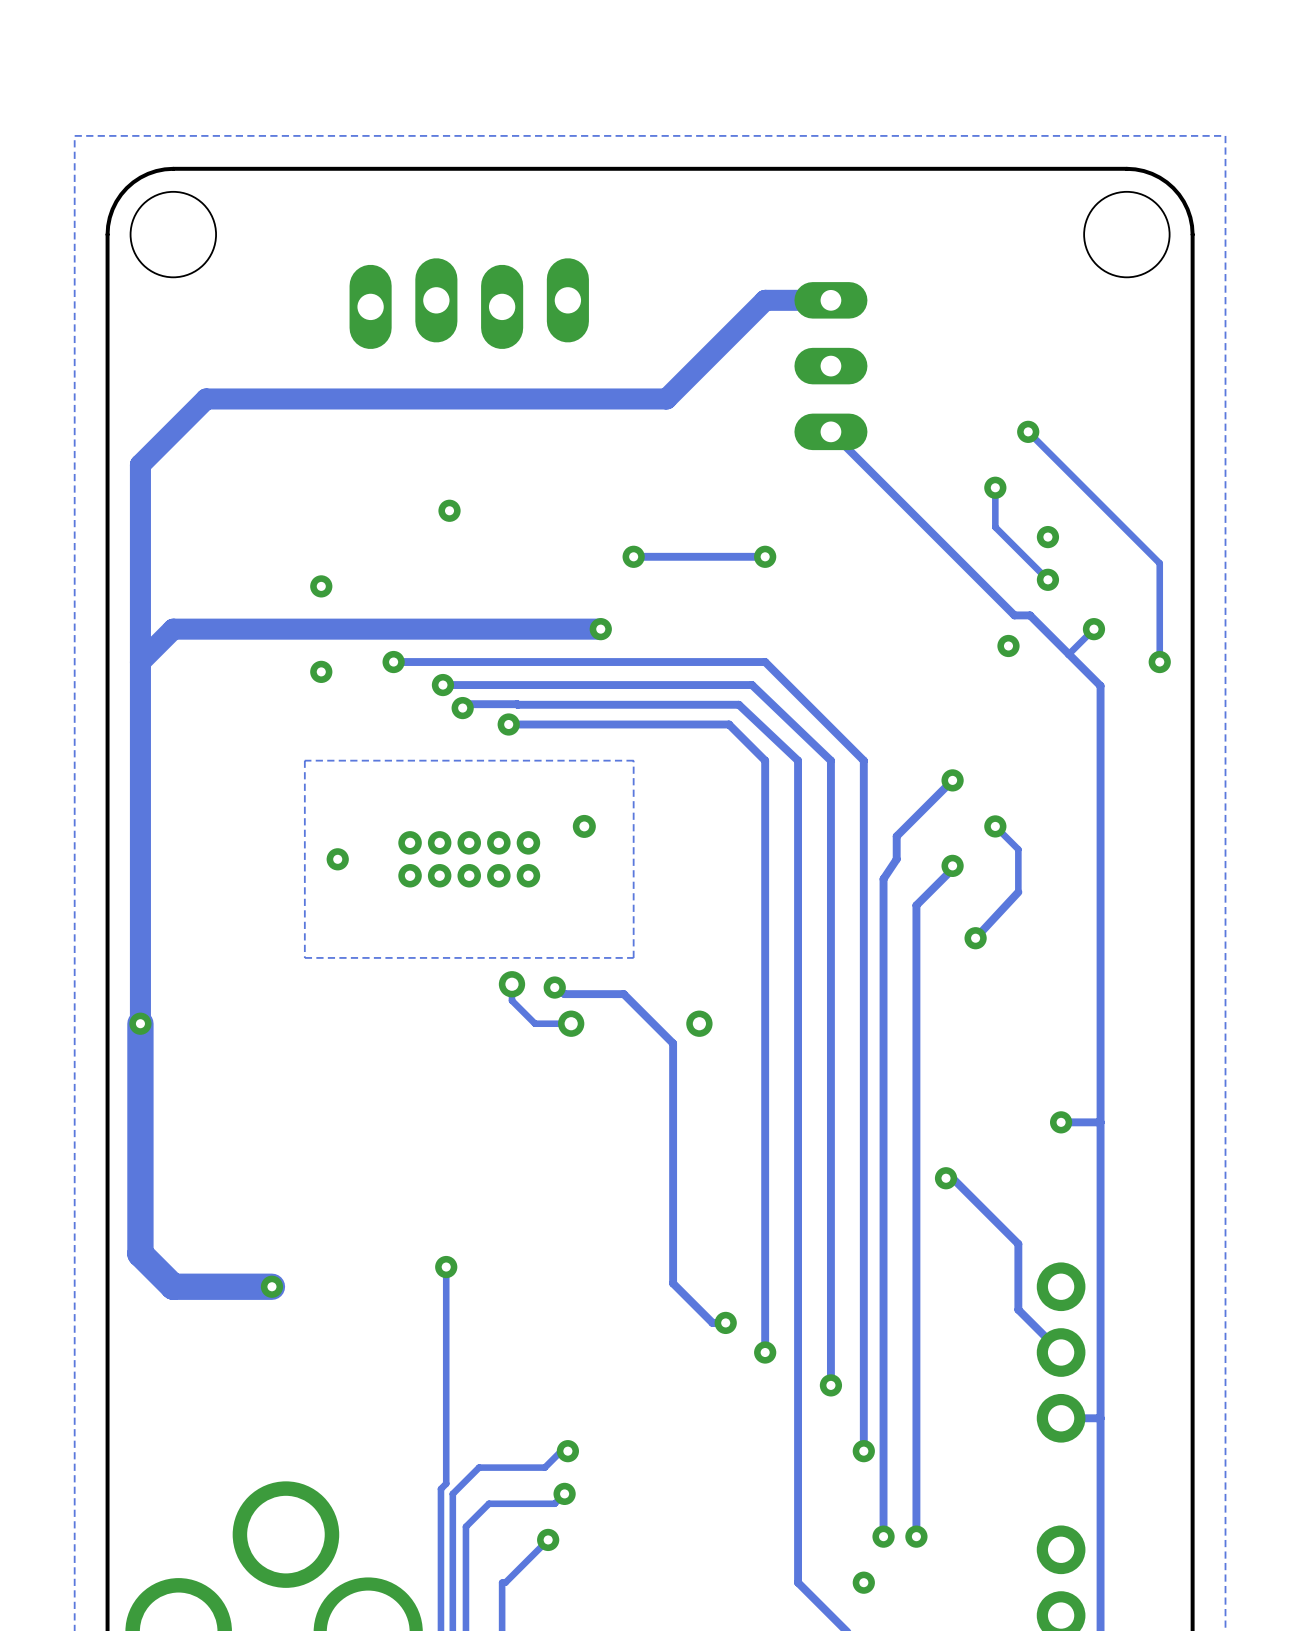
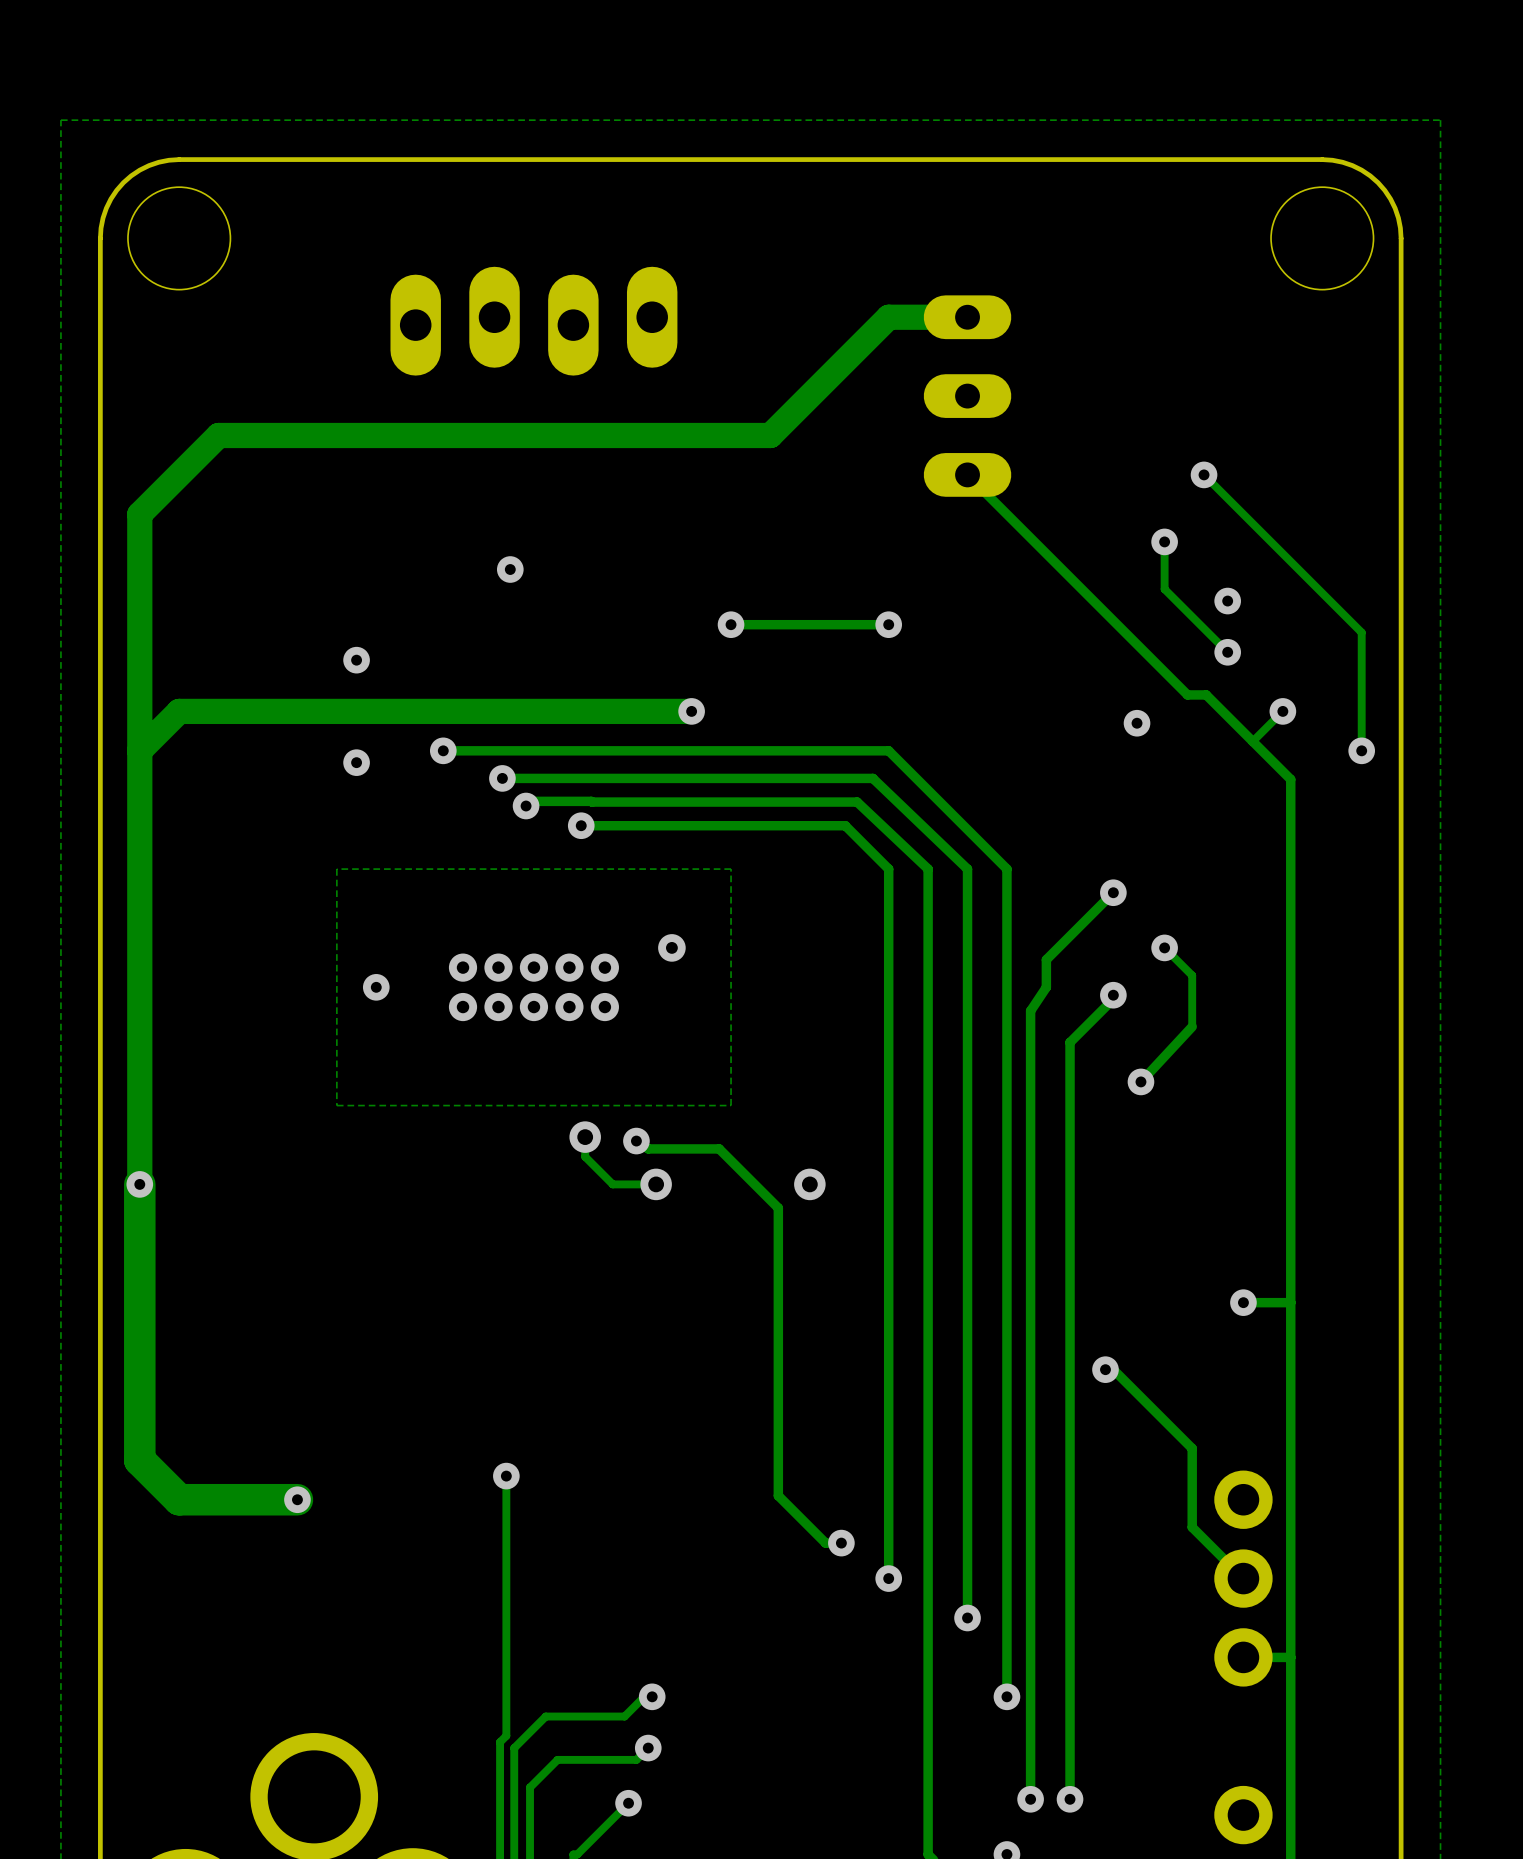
via position: (1008, 645) -> (1137, 723)

